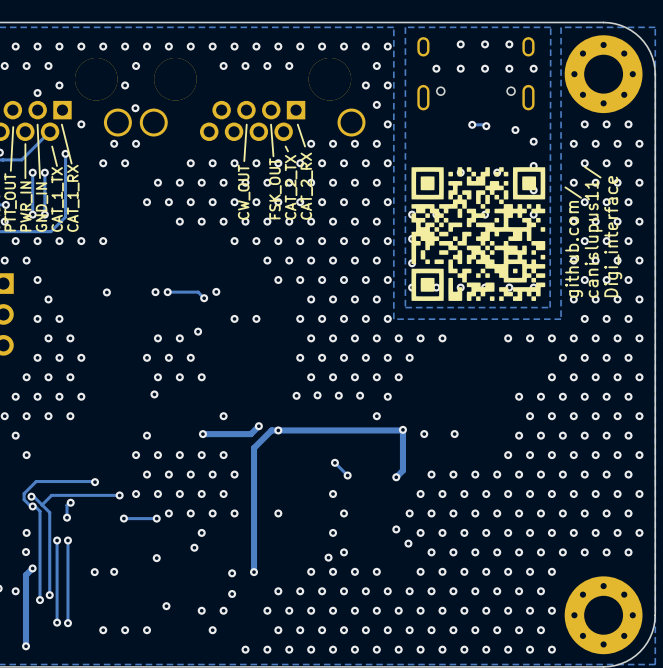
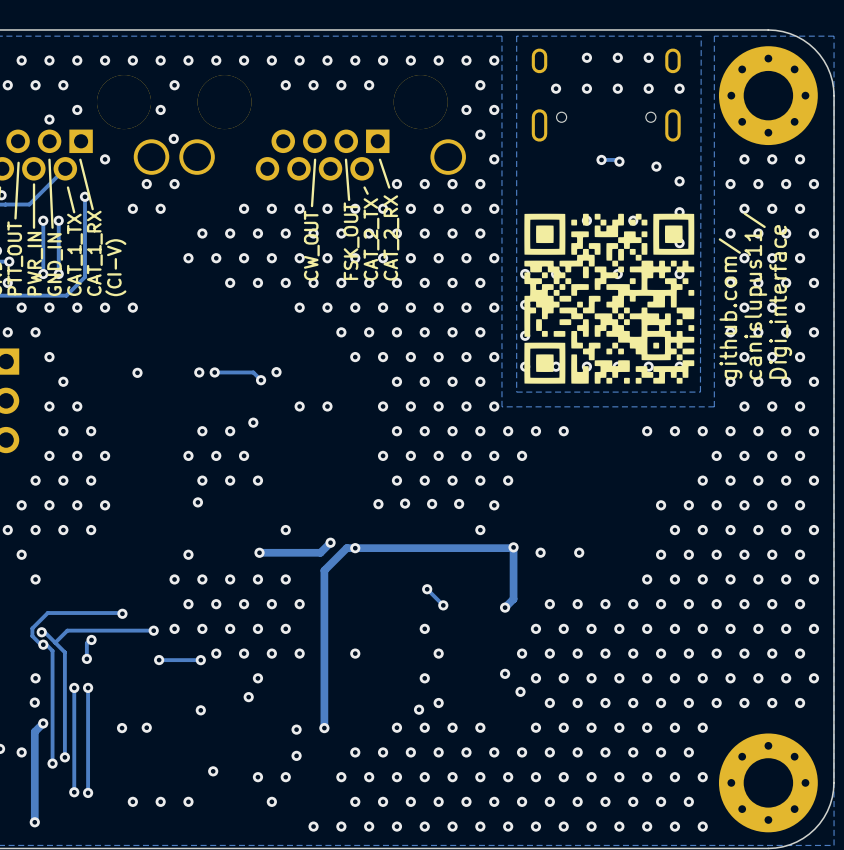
text: none -> (CI-V) (115, 267)

